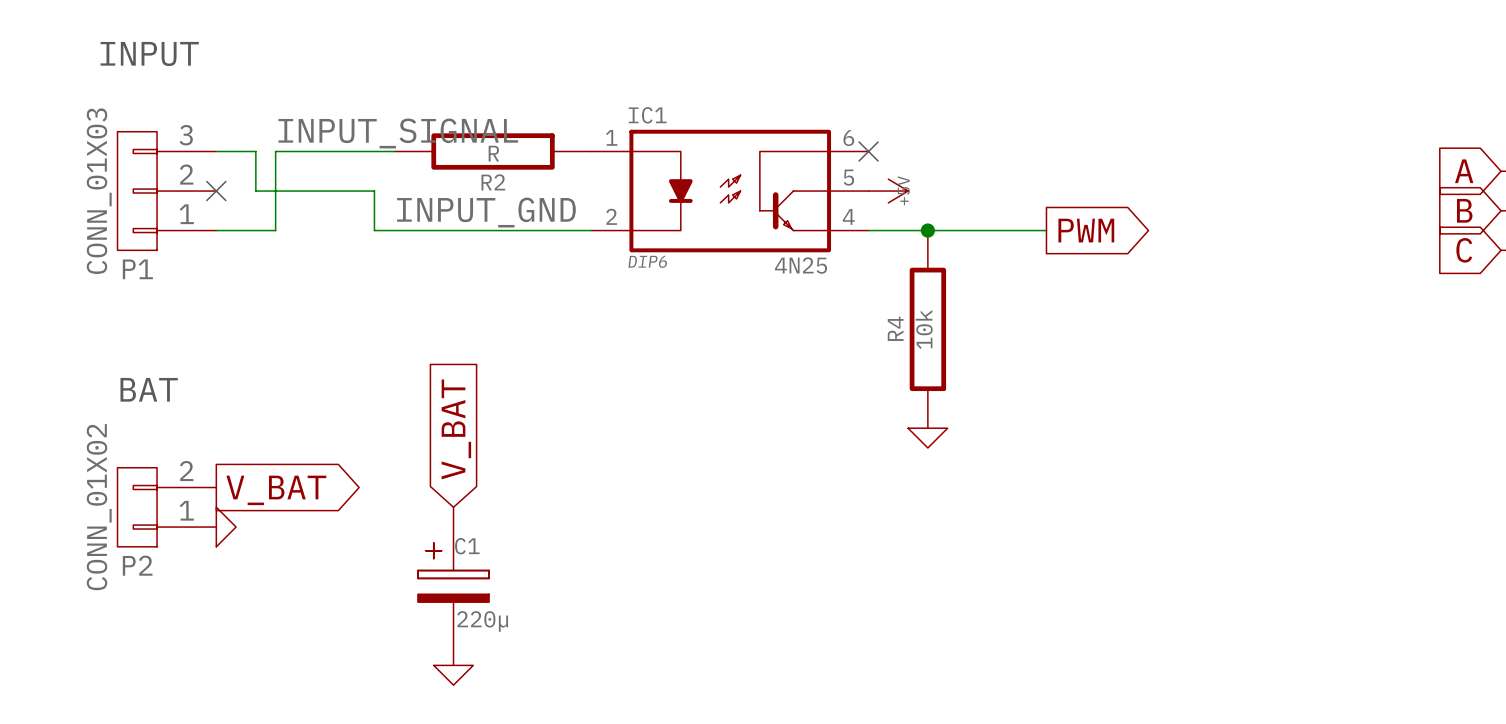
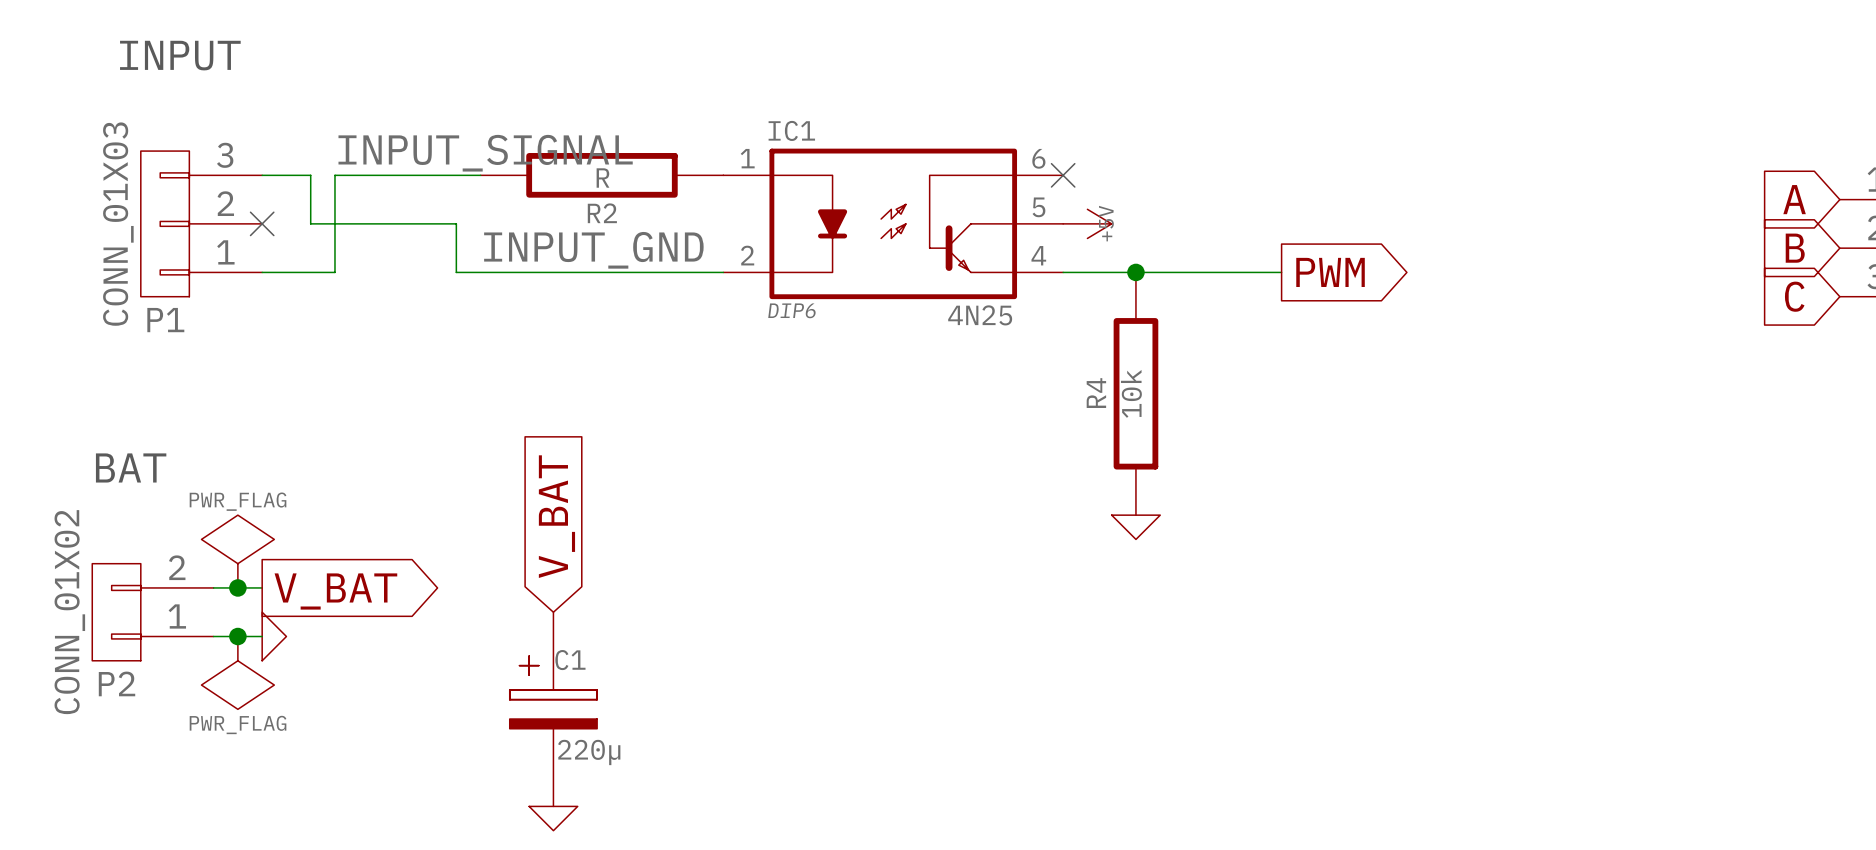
text position: BAT (149, 389) -> BAT (131, 467)
power symbol: none -> PWR_FLAG (237, 551)
junction: none -> (237, 587)
P2 position: (166, 507) -> (152, 612)
junction: none -> (237, 636)
power symbol: none -> PWR_FLAG (237, 672)

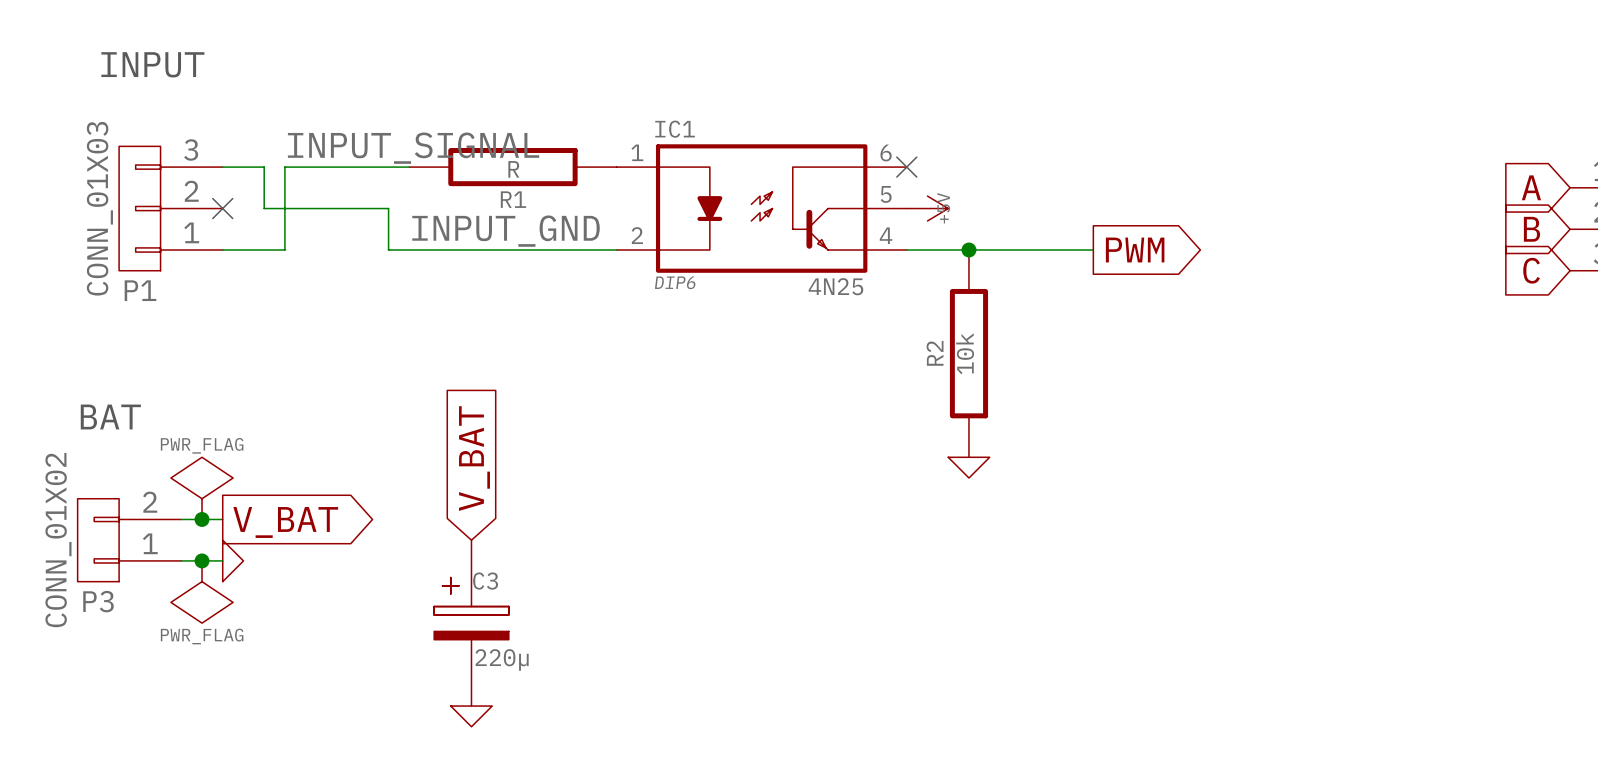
R2 name: R2 (602, 213) -> R1 (513, 199)
R4 name: R4 (1096, 393) -> R2 (935, 353)
C1 name: C1 (570, 660) -> C3 (485, 581)
P2 name: P2 (117, 683) -> P3 (98, 601)

